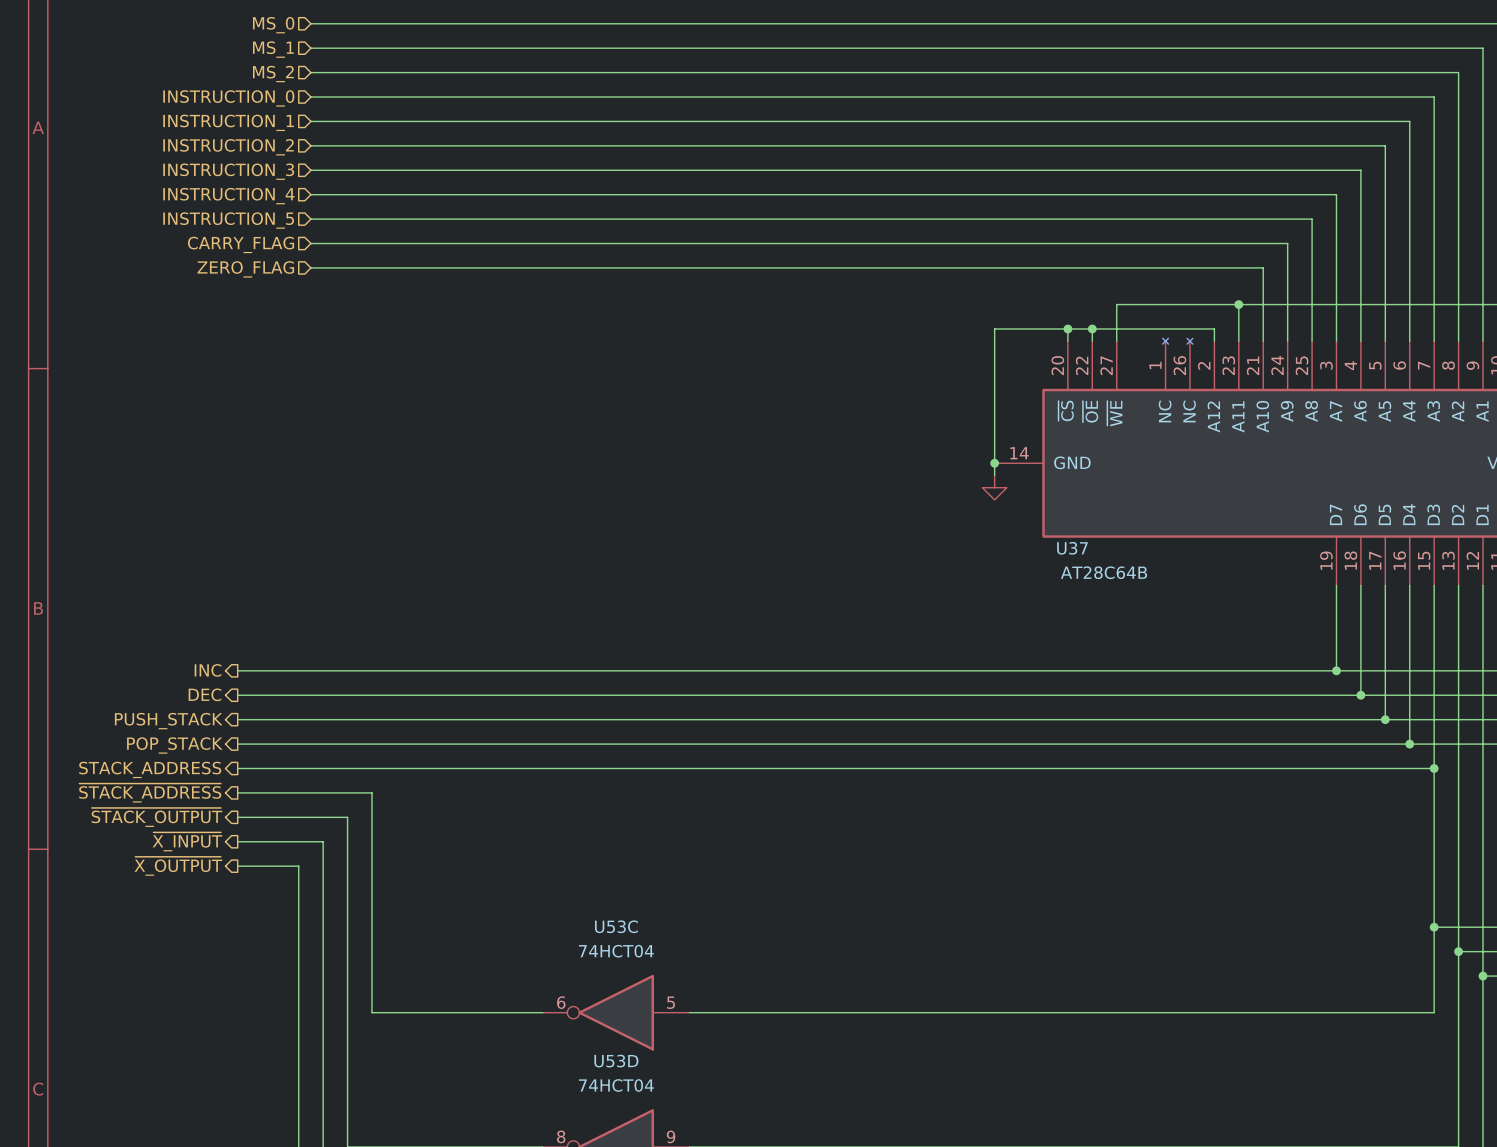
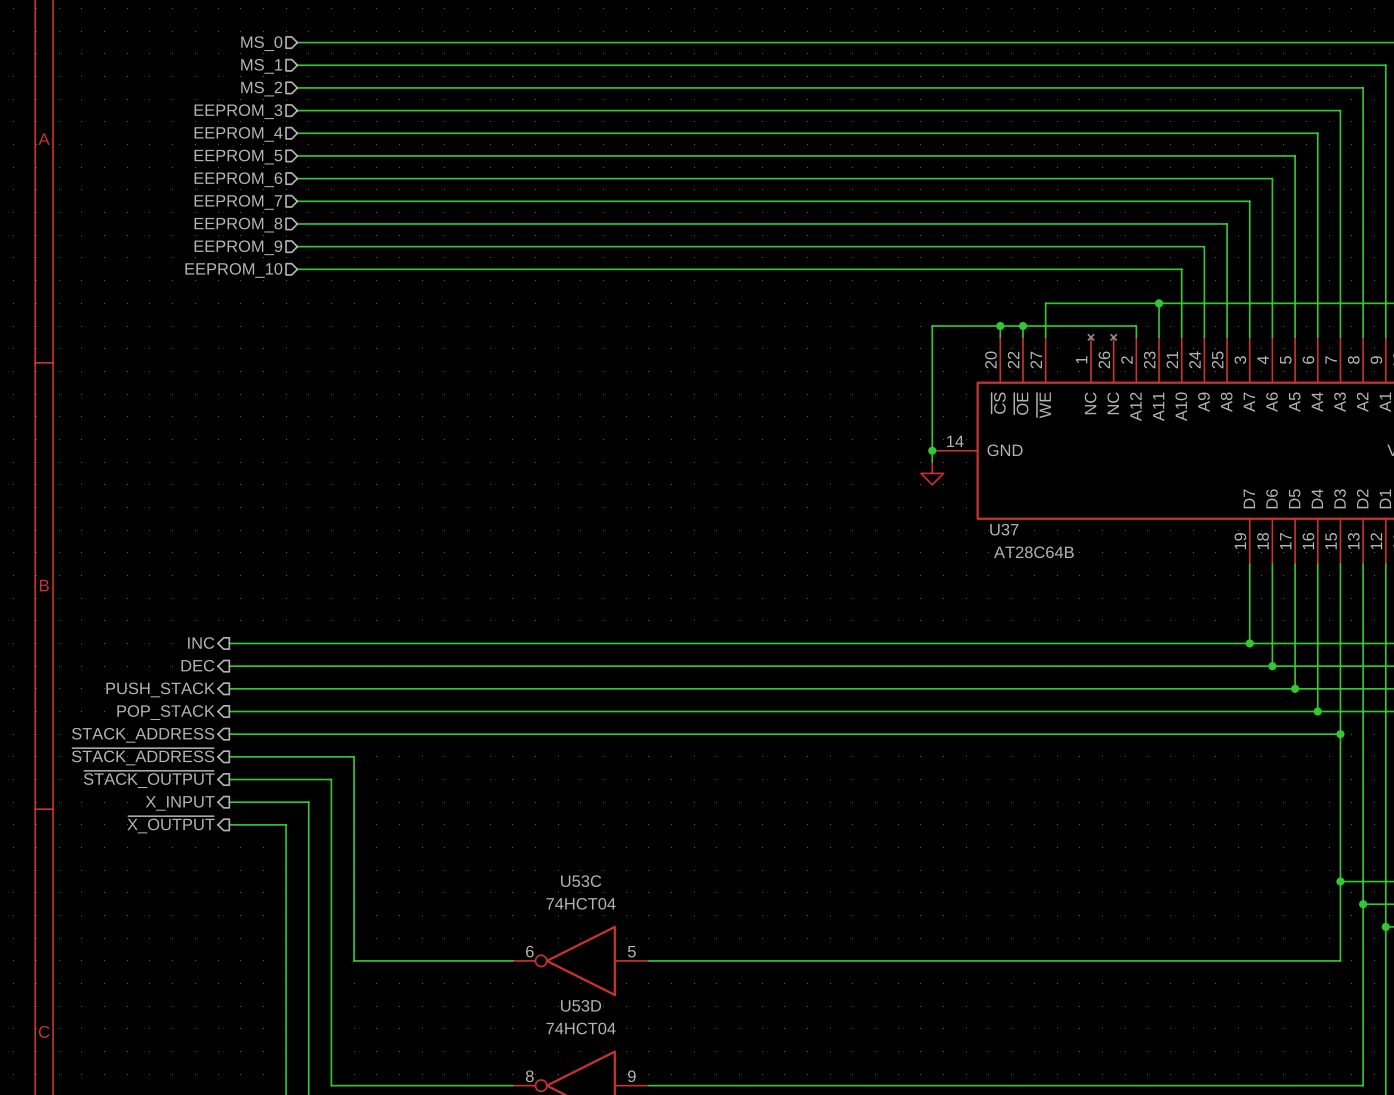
hierarchical label: INSTRUCTION_0 (228, 98) -> EEPROM_3 (238, 111)
hierarchical label: INSTRUCTION_1 (228, 122) -> EEPROM_4 (238, 134)
hierarchical label: INSTRUCTION_2 (228, 147) -> EEPROM_5 (238, 157)
hierarchical label: INSTRUCTION_3 (228, 171) -> EEPROM_6 (238, 179)
hierarchical label: INSTRUCTION_4 (228, 196) -> EEPROM_7 (238, 202)
hierarchical label: INSTRUCTION_5 (228, 220) -> EEPROM_8 (238, 225)
hierarchical label: CARRY_FLAG (241, 244) -> EEPROM_9 (238, 247)
hierarchical label: ZERO_FLAG (245, 269) -> EEPROM_10 (233, 270)
hierarchical label: ~{X_INPUT} (187, 841) -> X_INPUT (180, 803)

